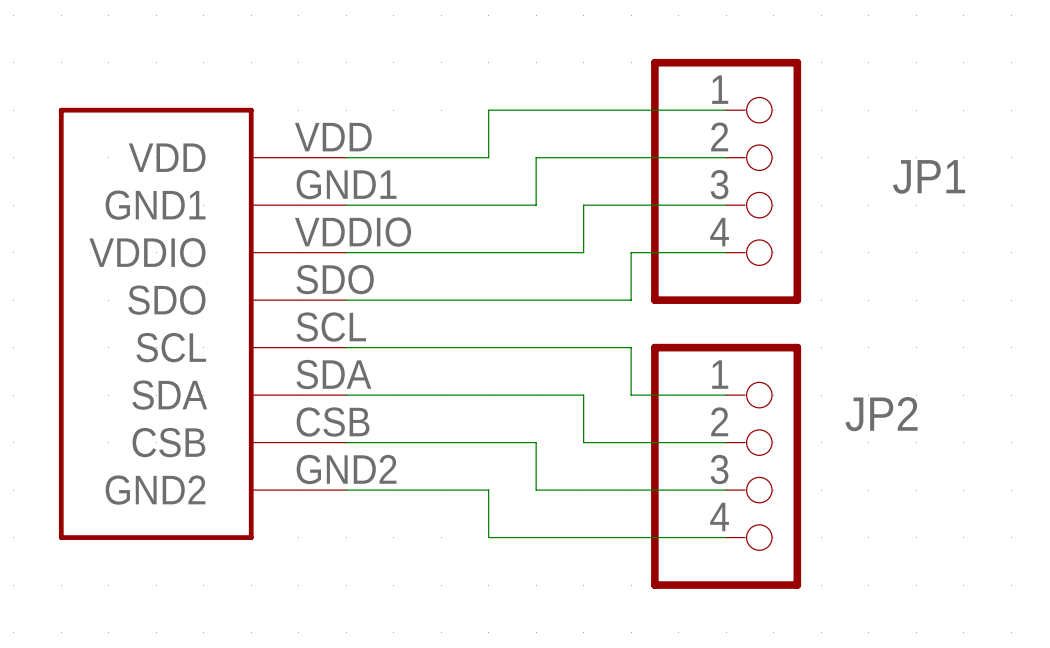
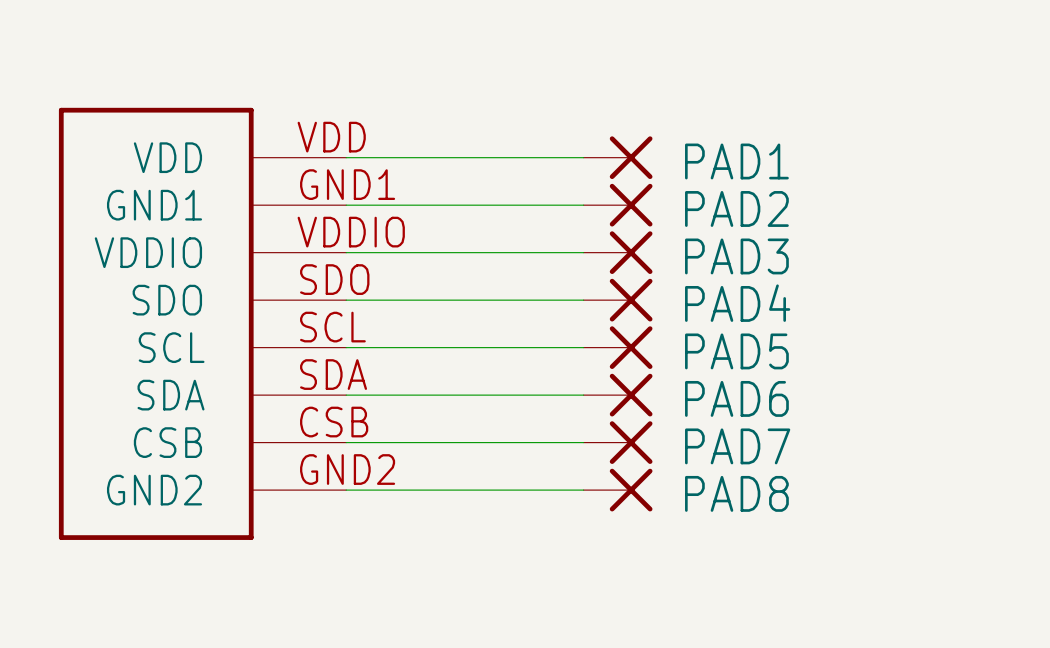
wire: (726, 110) (488, 110) (488, 157) -> none
wire: (536, 157) (536, 205) -> (536, 157) (488, 157)
wire: (583, 157) (726, 157) -> none
PAD1: none -> (618, 157)
JP1: (726, 181) -> none
wire: none -> (536, 205) (583, 205)
PAD2: none -> (618, 205)
wire: (726, 205) (583, 205) (583, 252) -> none
PAD3: none -> (618, 252)
wire: (726, 252) (631, 252) (631, 300) (583, 300) -> none
PAD4: none -> (618, 300)
wire: (583, 347) (631, 347) (631, 395) (726, 395) -> none
PAD5: none -> (618, 347)
wire: (583, 395) (583, 442) (726, 442) -> none
PAD6: none -> (618, 395)
wire: (536, 442) (536, 490) -> (488, 490) (536, 490)
wire: none -> (536, 442) (583, 442)
PAD7: none -> (618, 442)
JP2: (726, 466) -> none
wire: (488, 490) (488, 537) (726, 537) -> none
wire: (583, 490) (726, 490) -> none
PAD8: none -> (618, 490)

